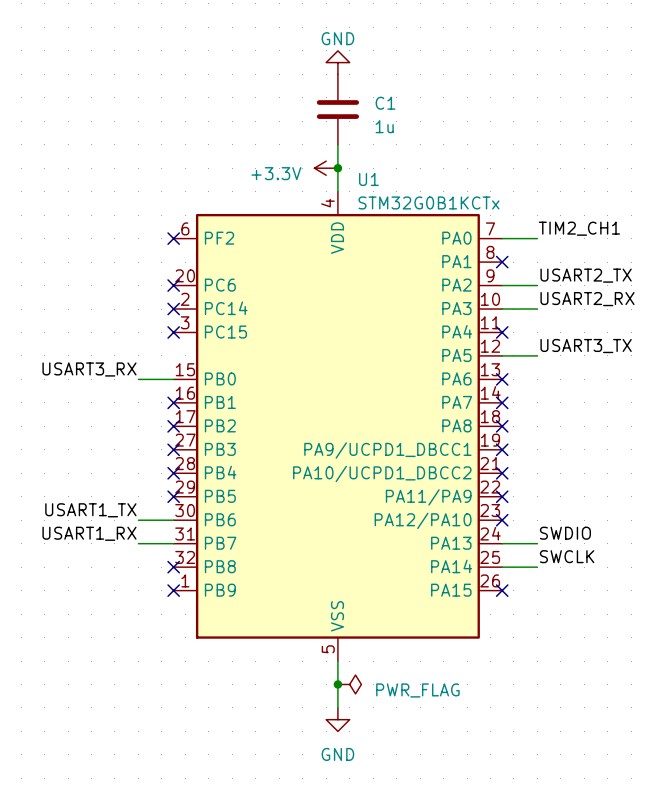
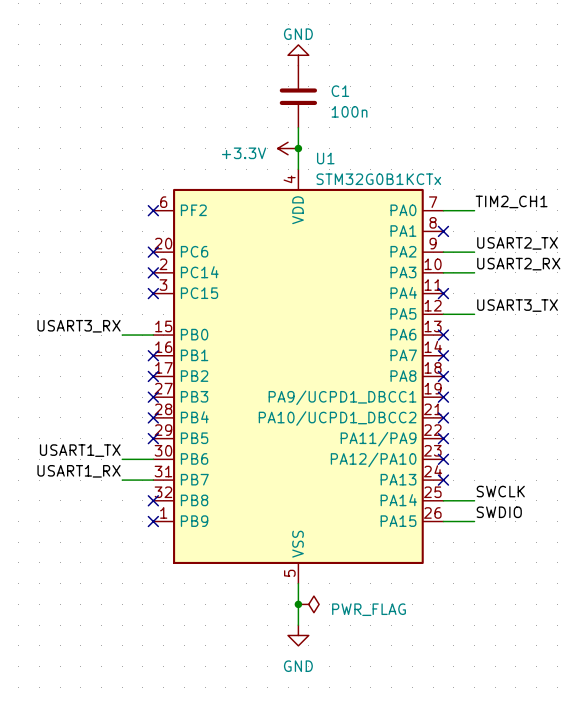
C1 value: 1u (384, 126) -> 100n (349, 111)
label position: SWDIO (565, 533) -> SWDIO (499, 512)
wire: (502, 543) (537, 543) -> (443, 521) (474, 521)
no-connect mark position: (502, 590) -> (443, 480)

